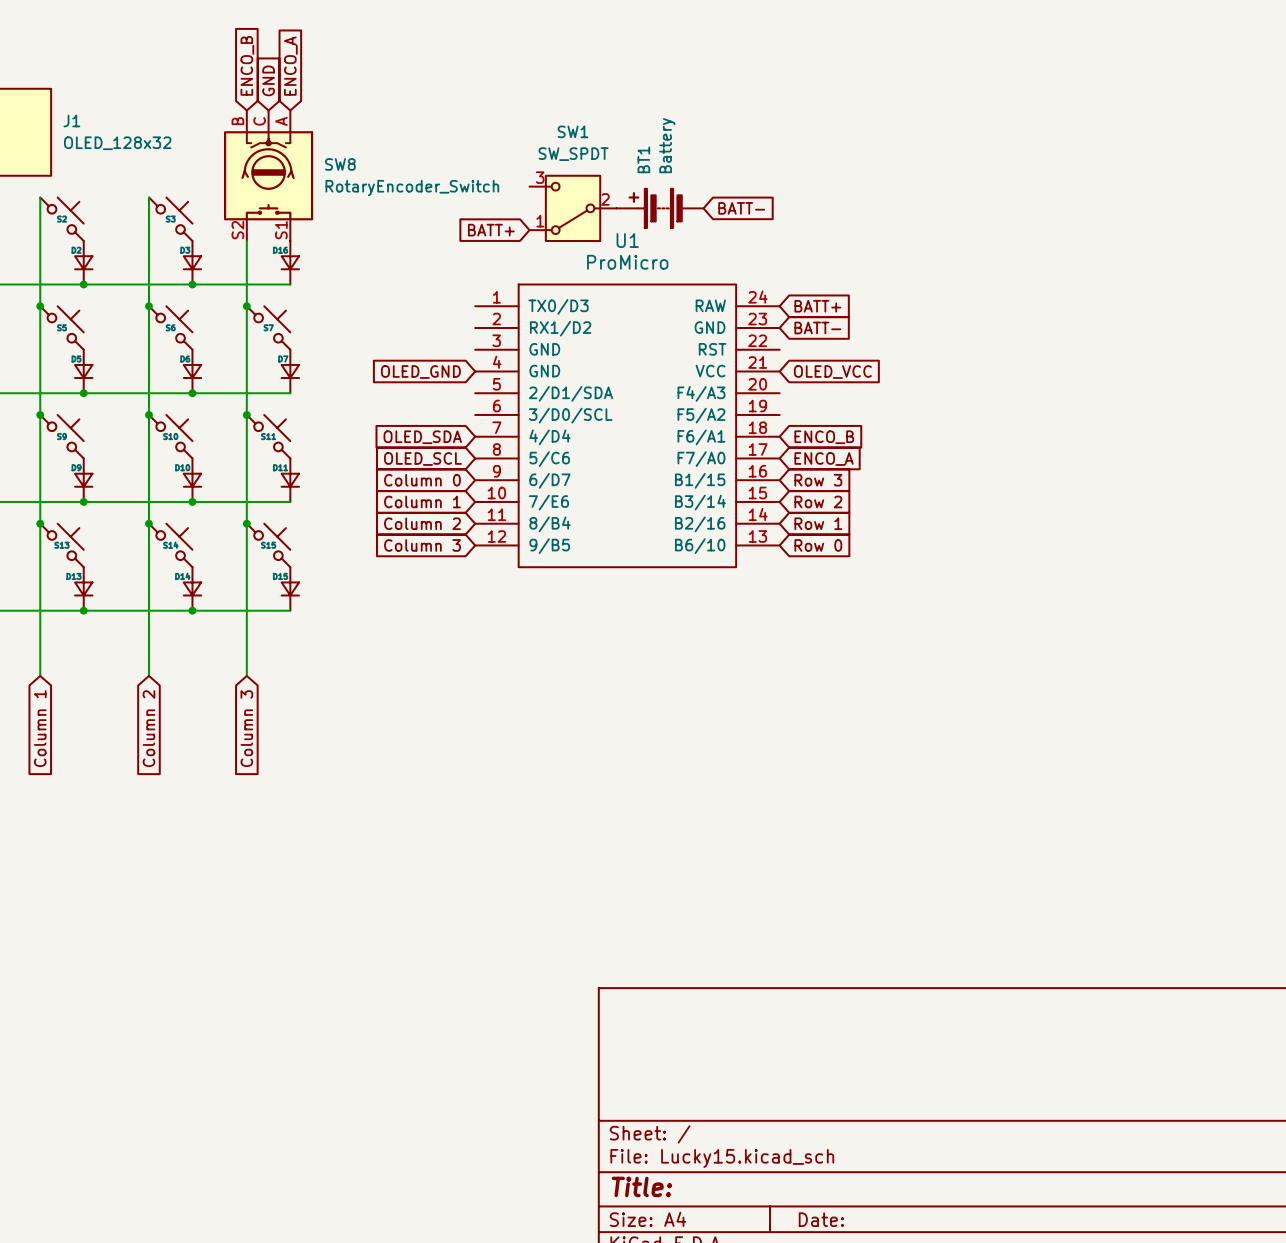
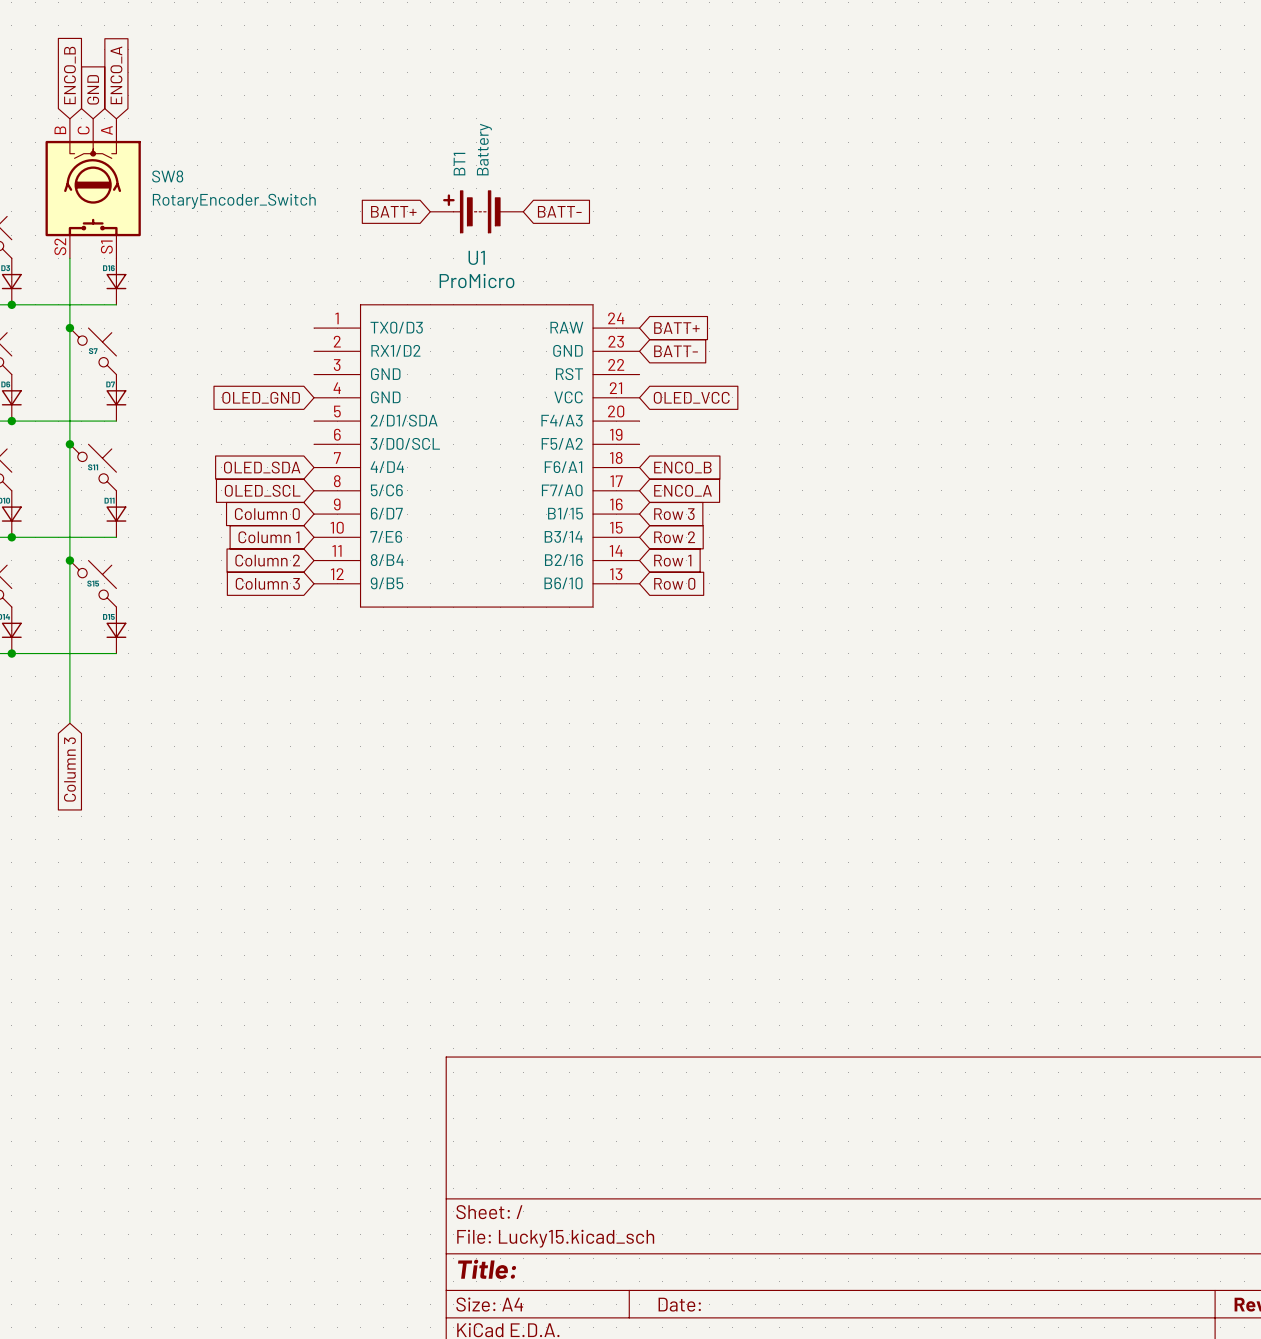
SW1: SW_SPDT (573, 208) -> none
BT1 position: (660, 208) -> (476, 211)
global label position: BATT- (741, 208) -> BATT- (559, 211)
global label position: BATT+ (491, 230) -> BATT+ (393, 211)

